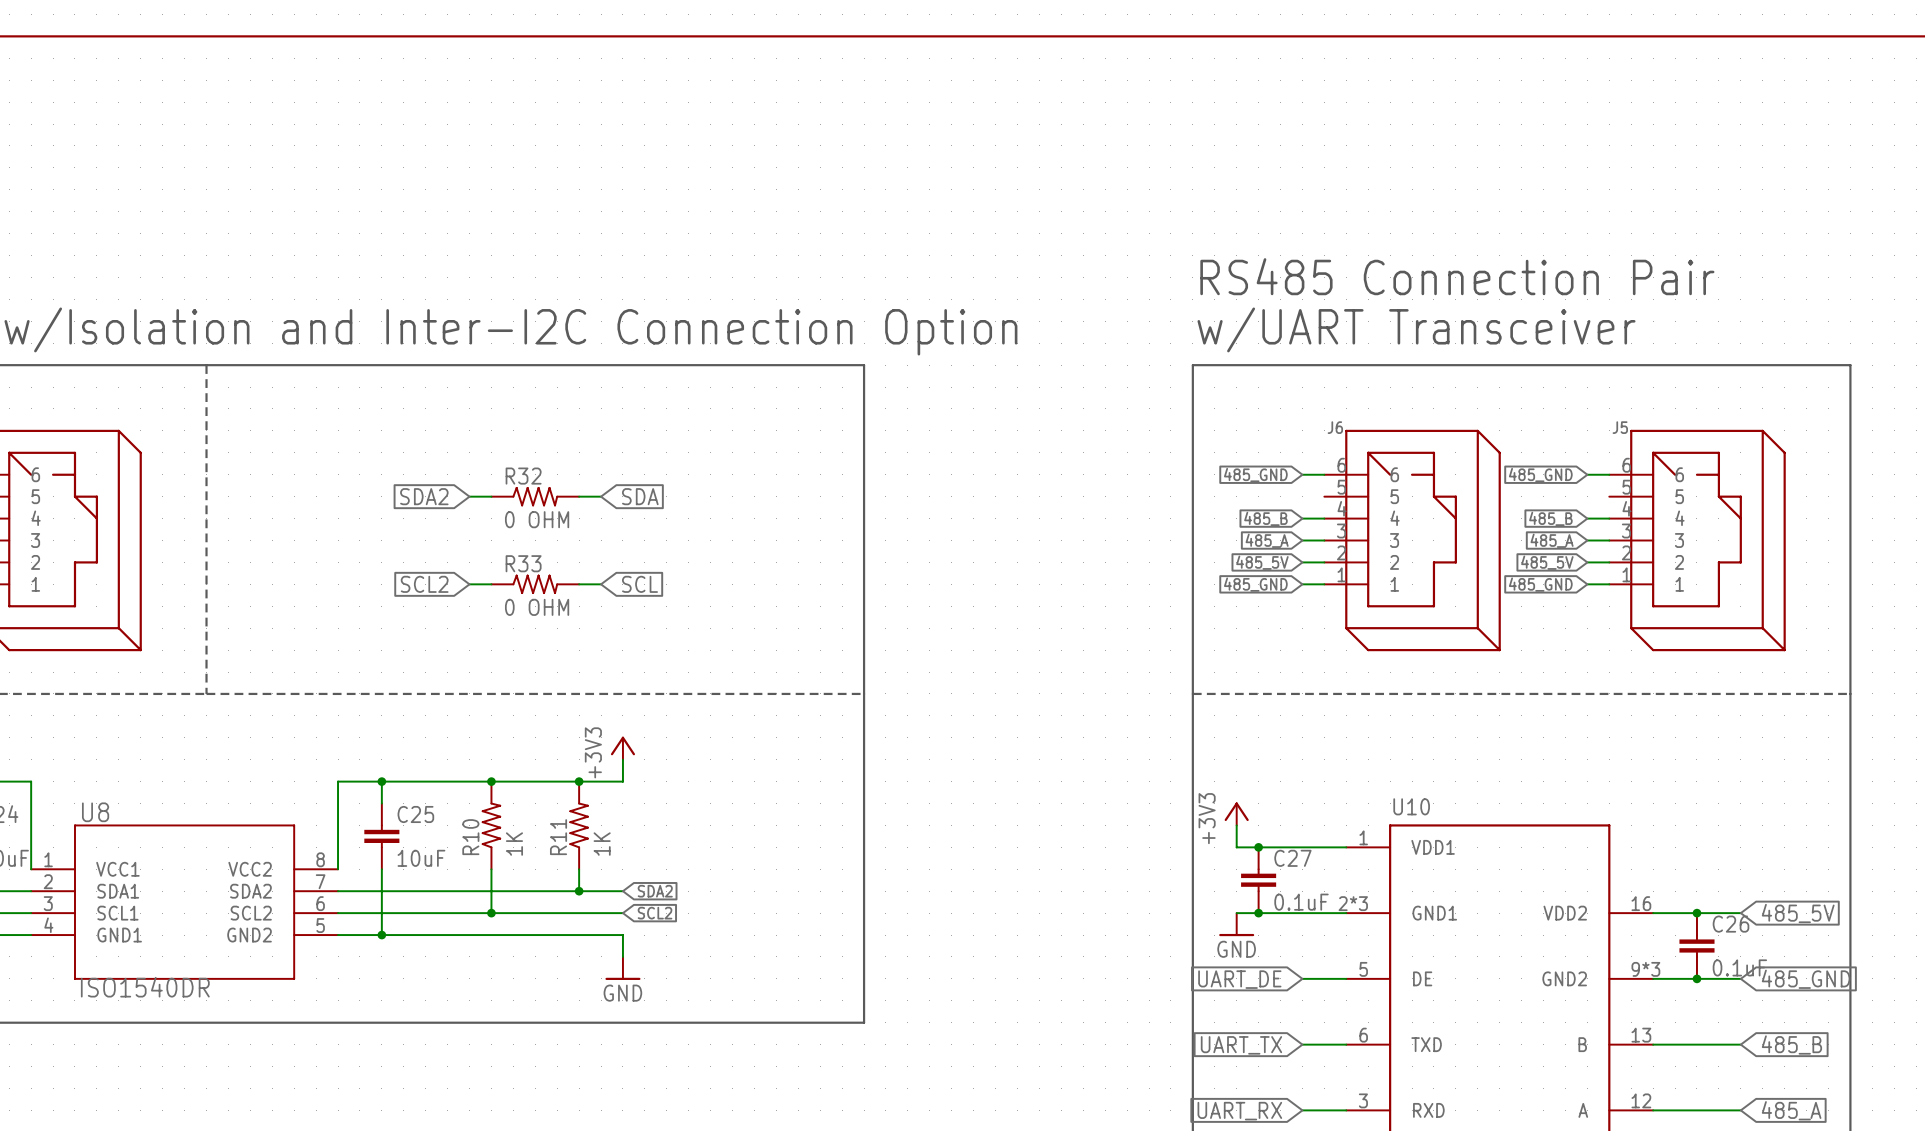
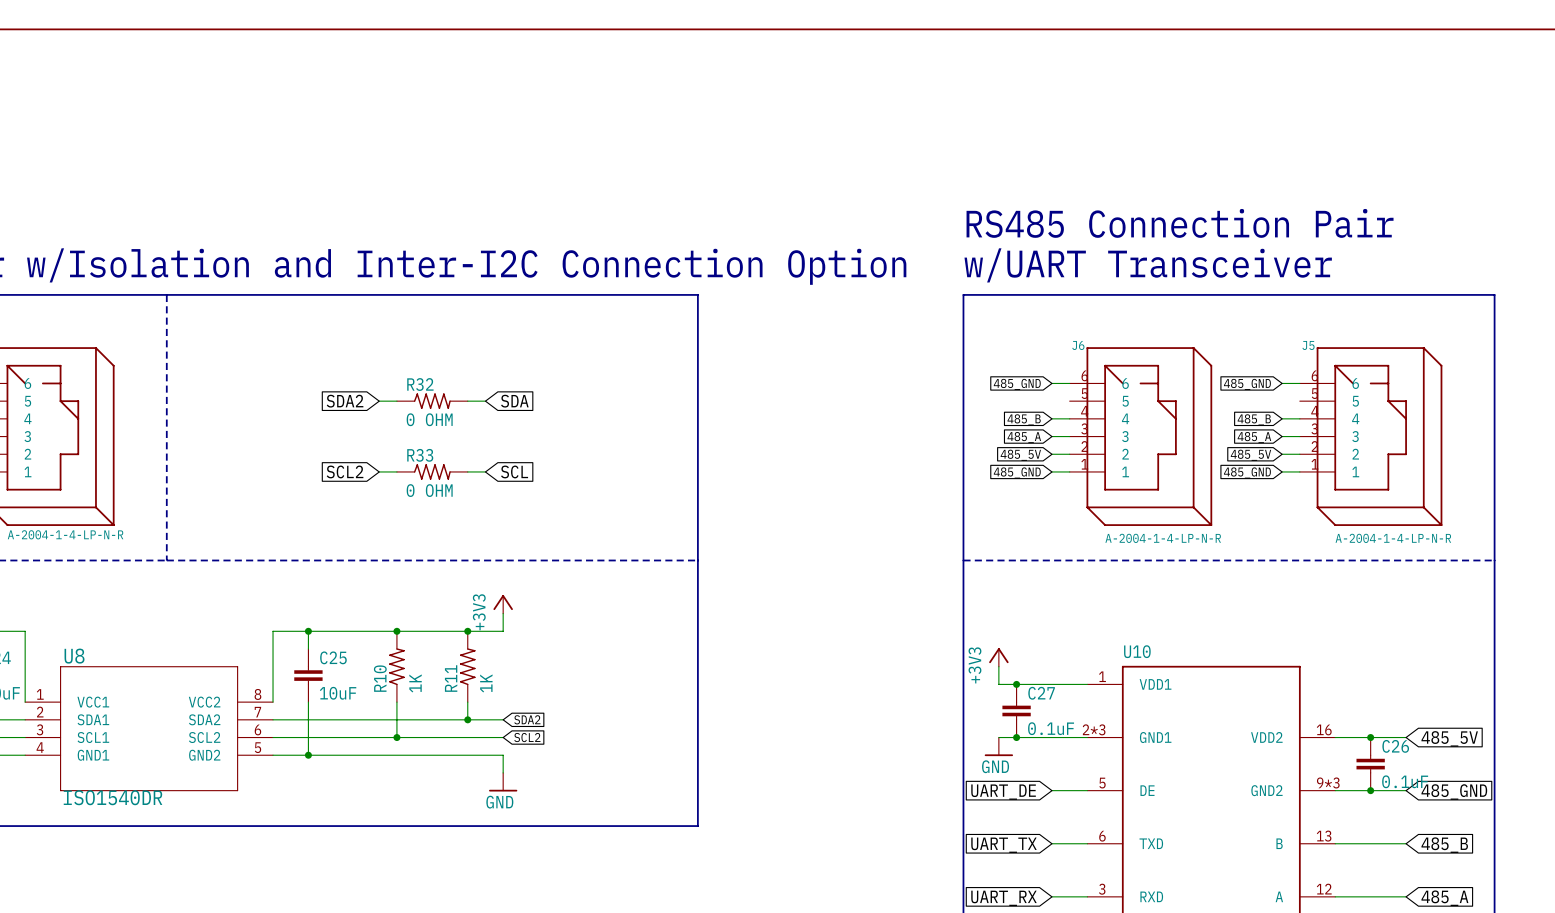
part value: none -> A-2004-1-4-LP-N-R (65, 534)
J6 value: none -> A-2004-1-4-LP-N-R (1163, 538)
J5 value: none -> A-2004-1-4-LP-N-R (1393, 538)

